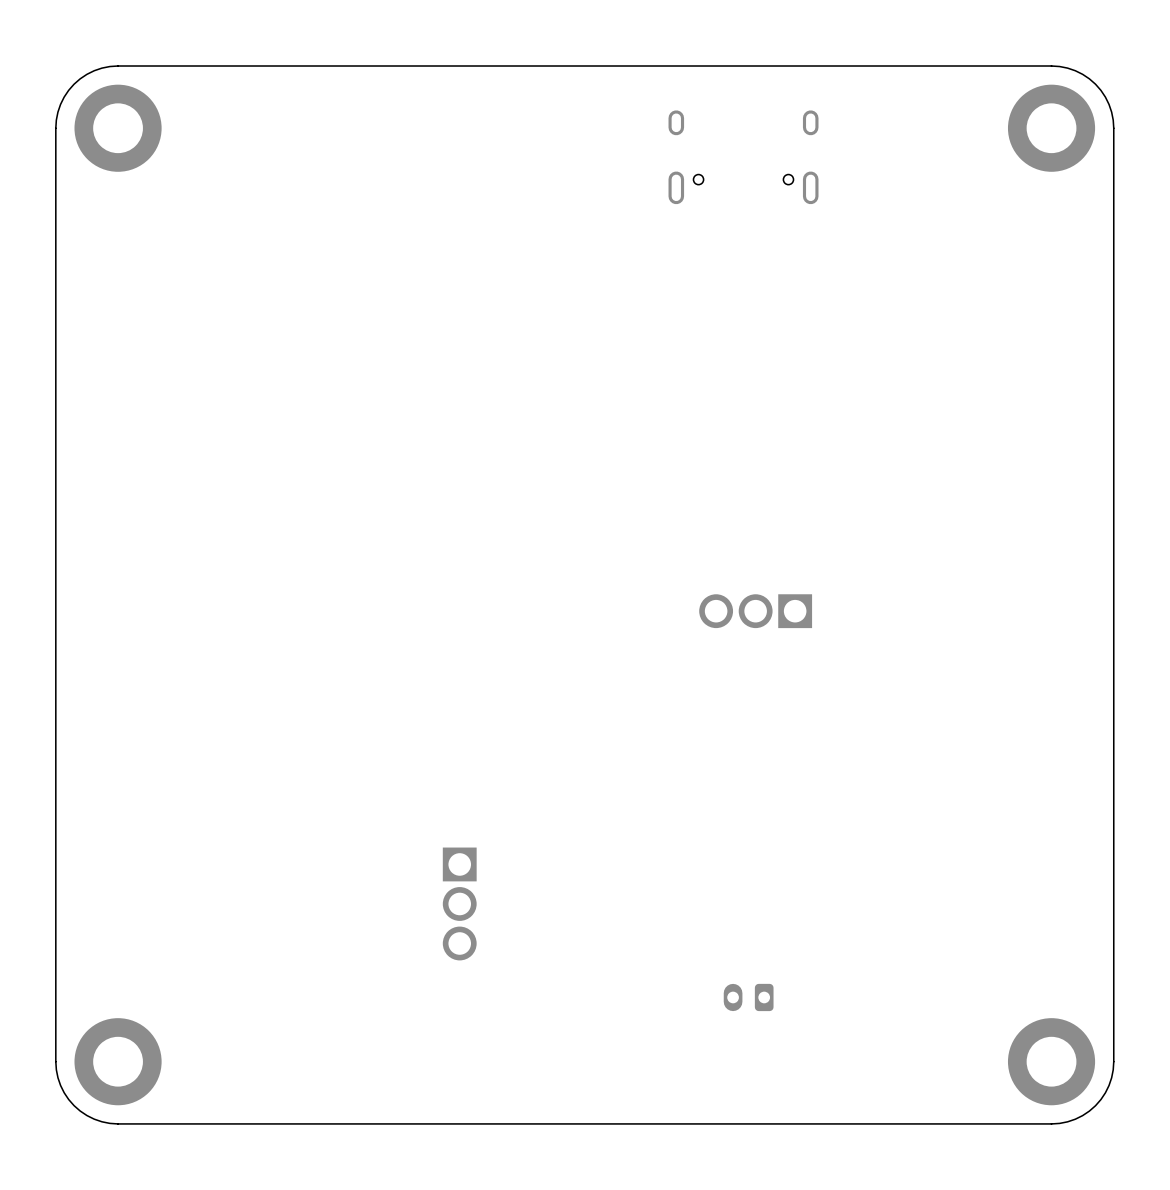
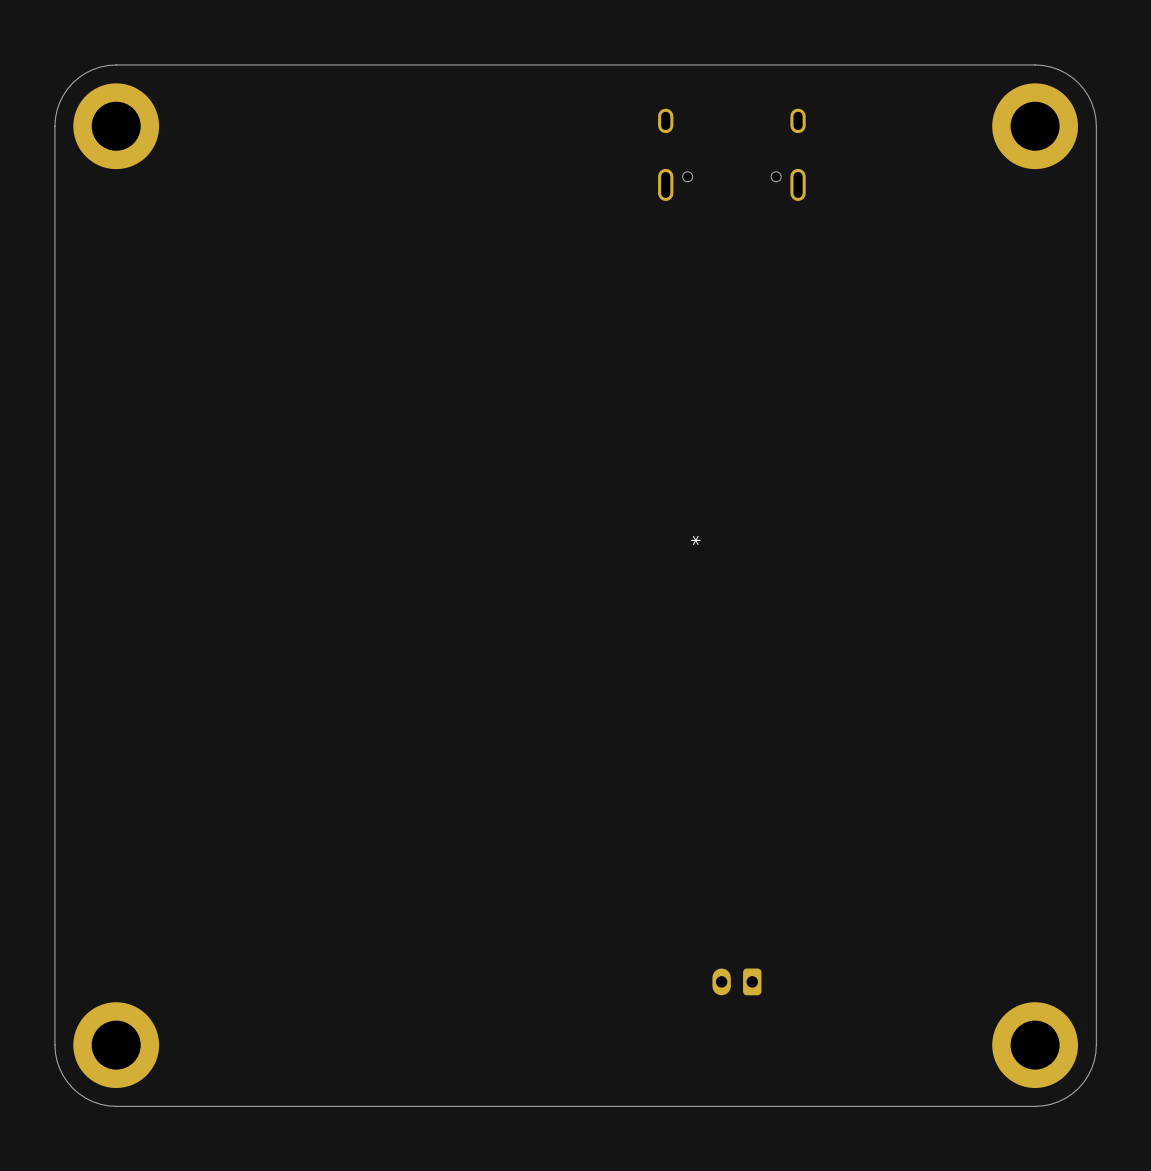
part: none -> (695, 540)
part: (755, 611) -> none
part: (459, 903) -> none

